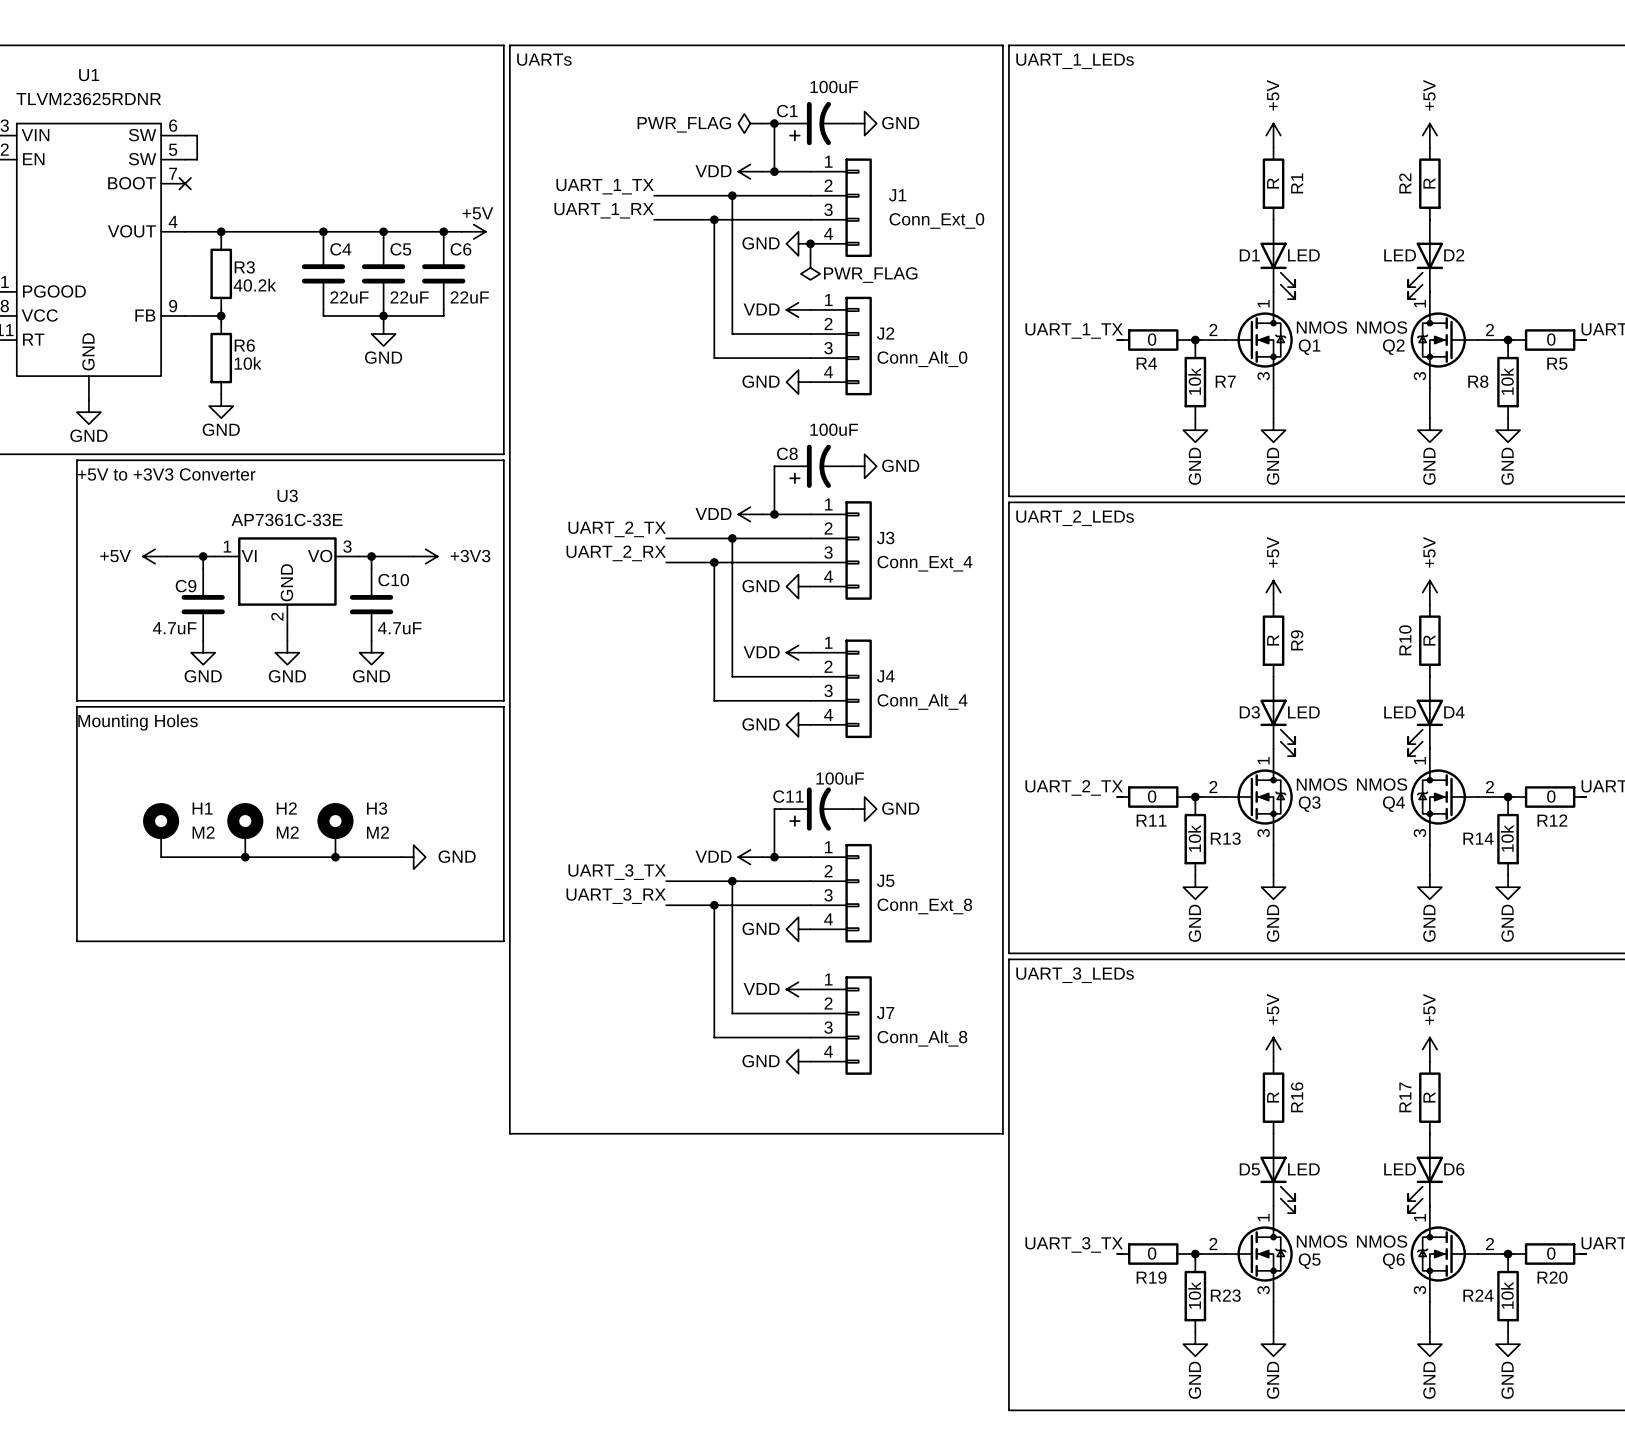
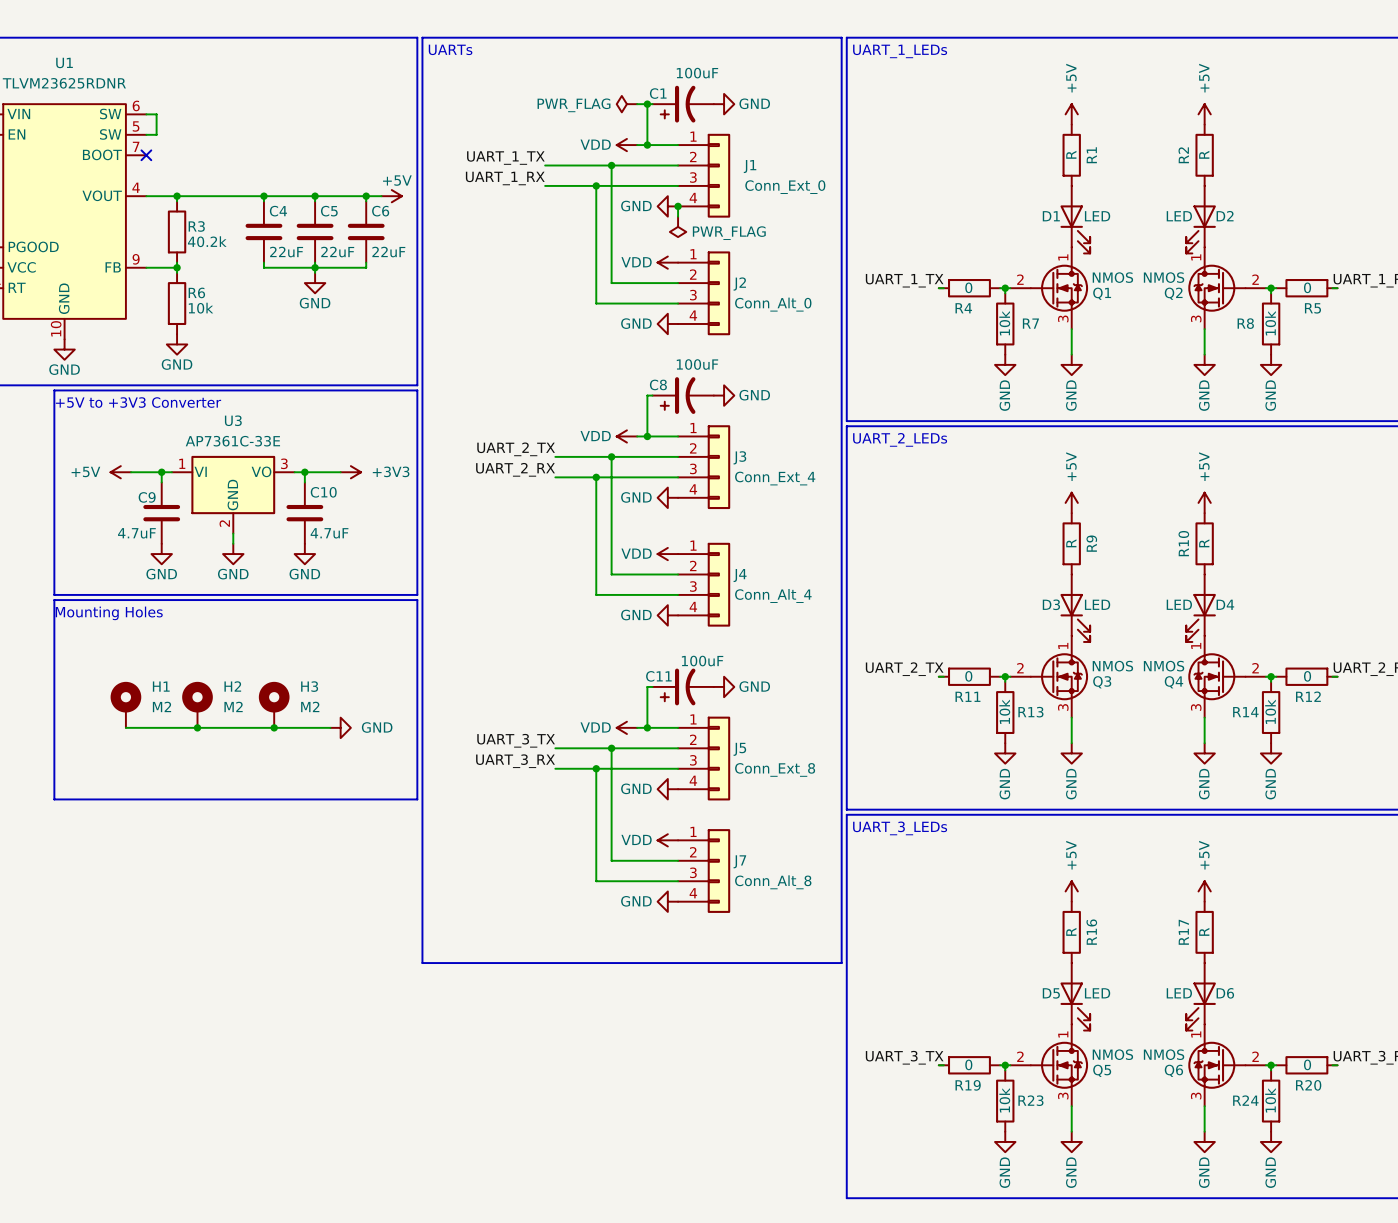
U1 pin number: none -> 10 (56, 328)

